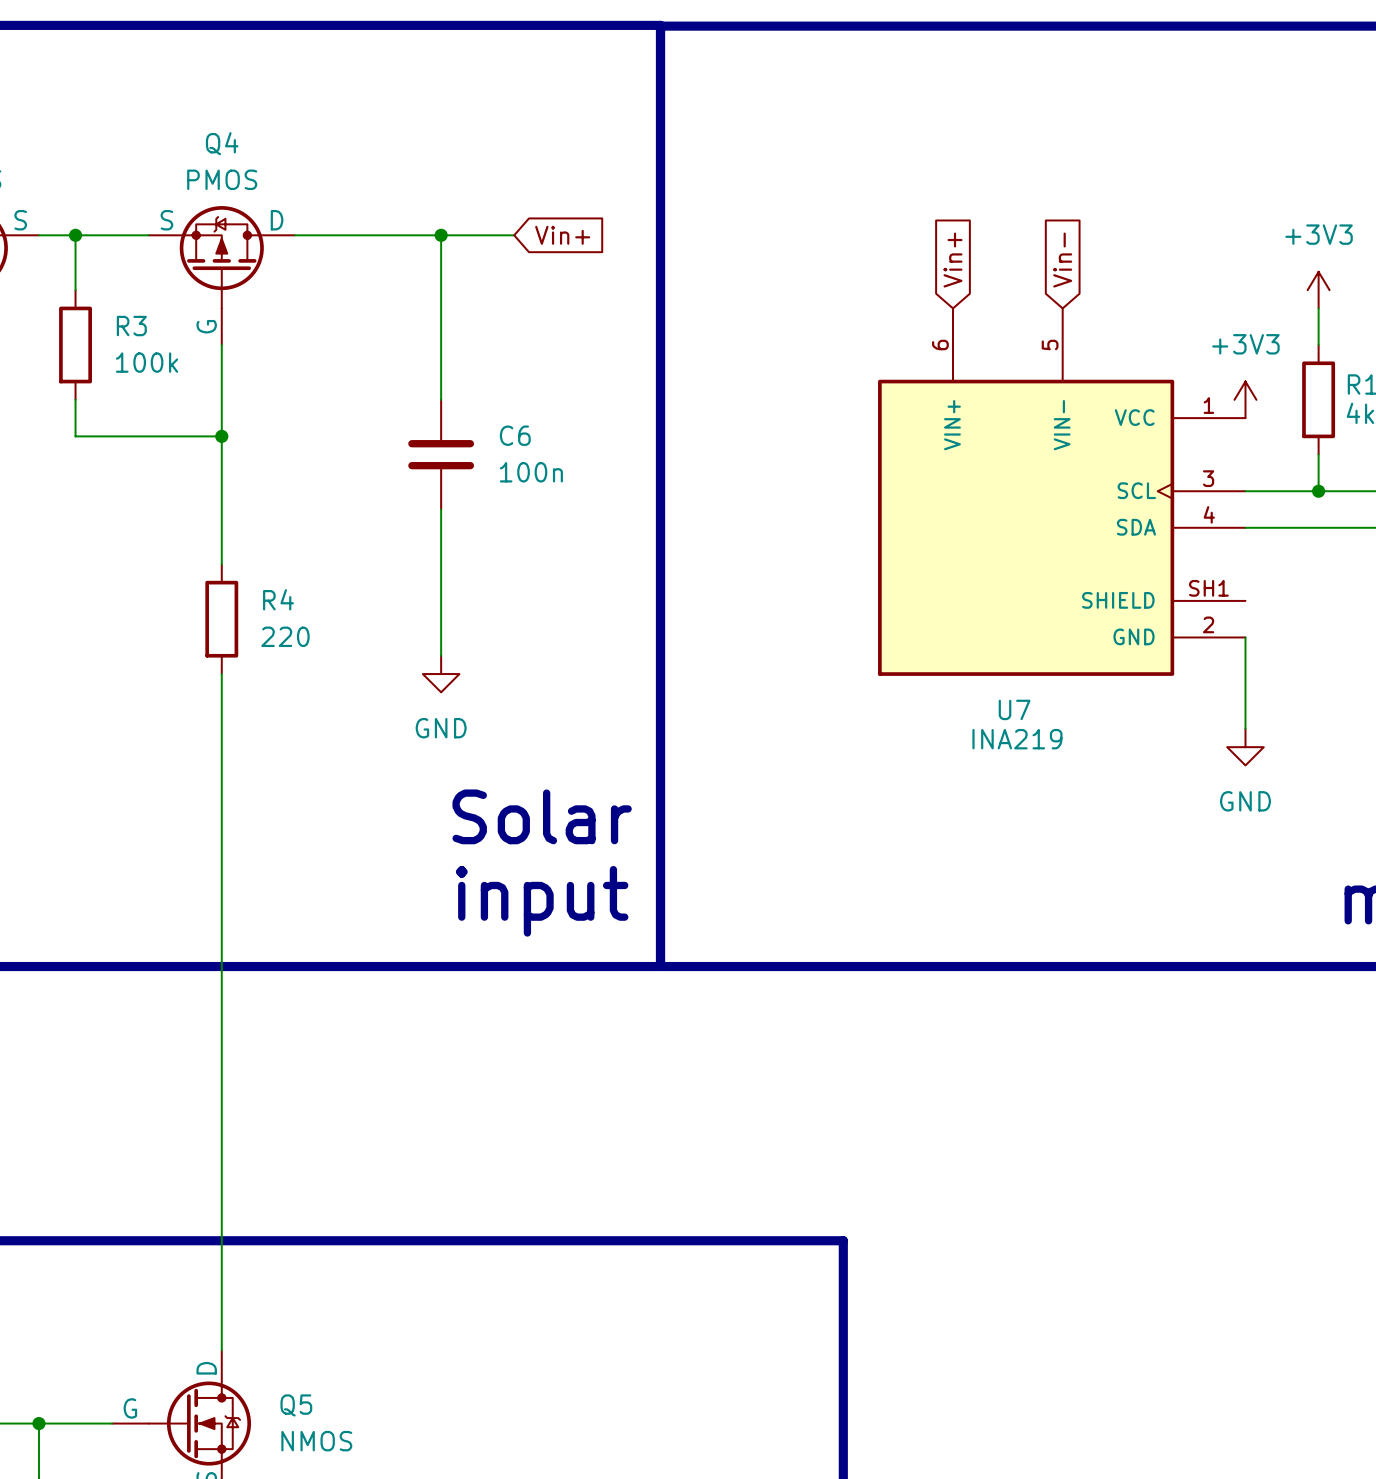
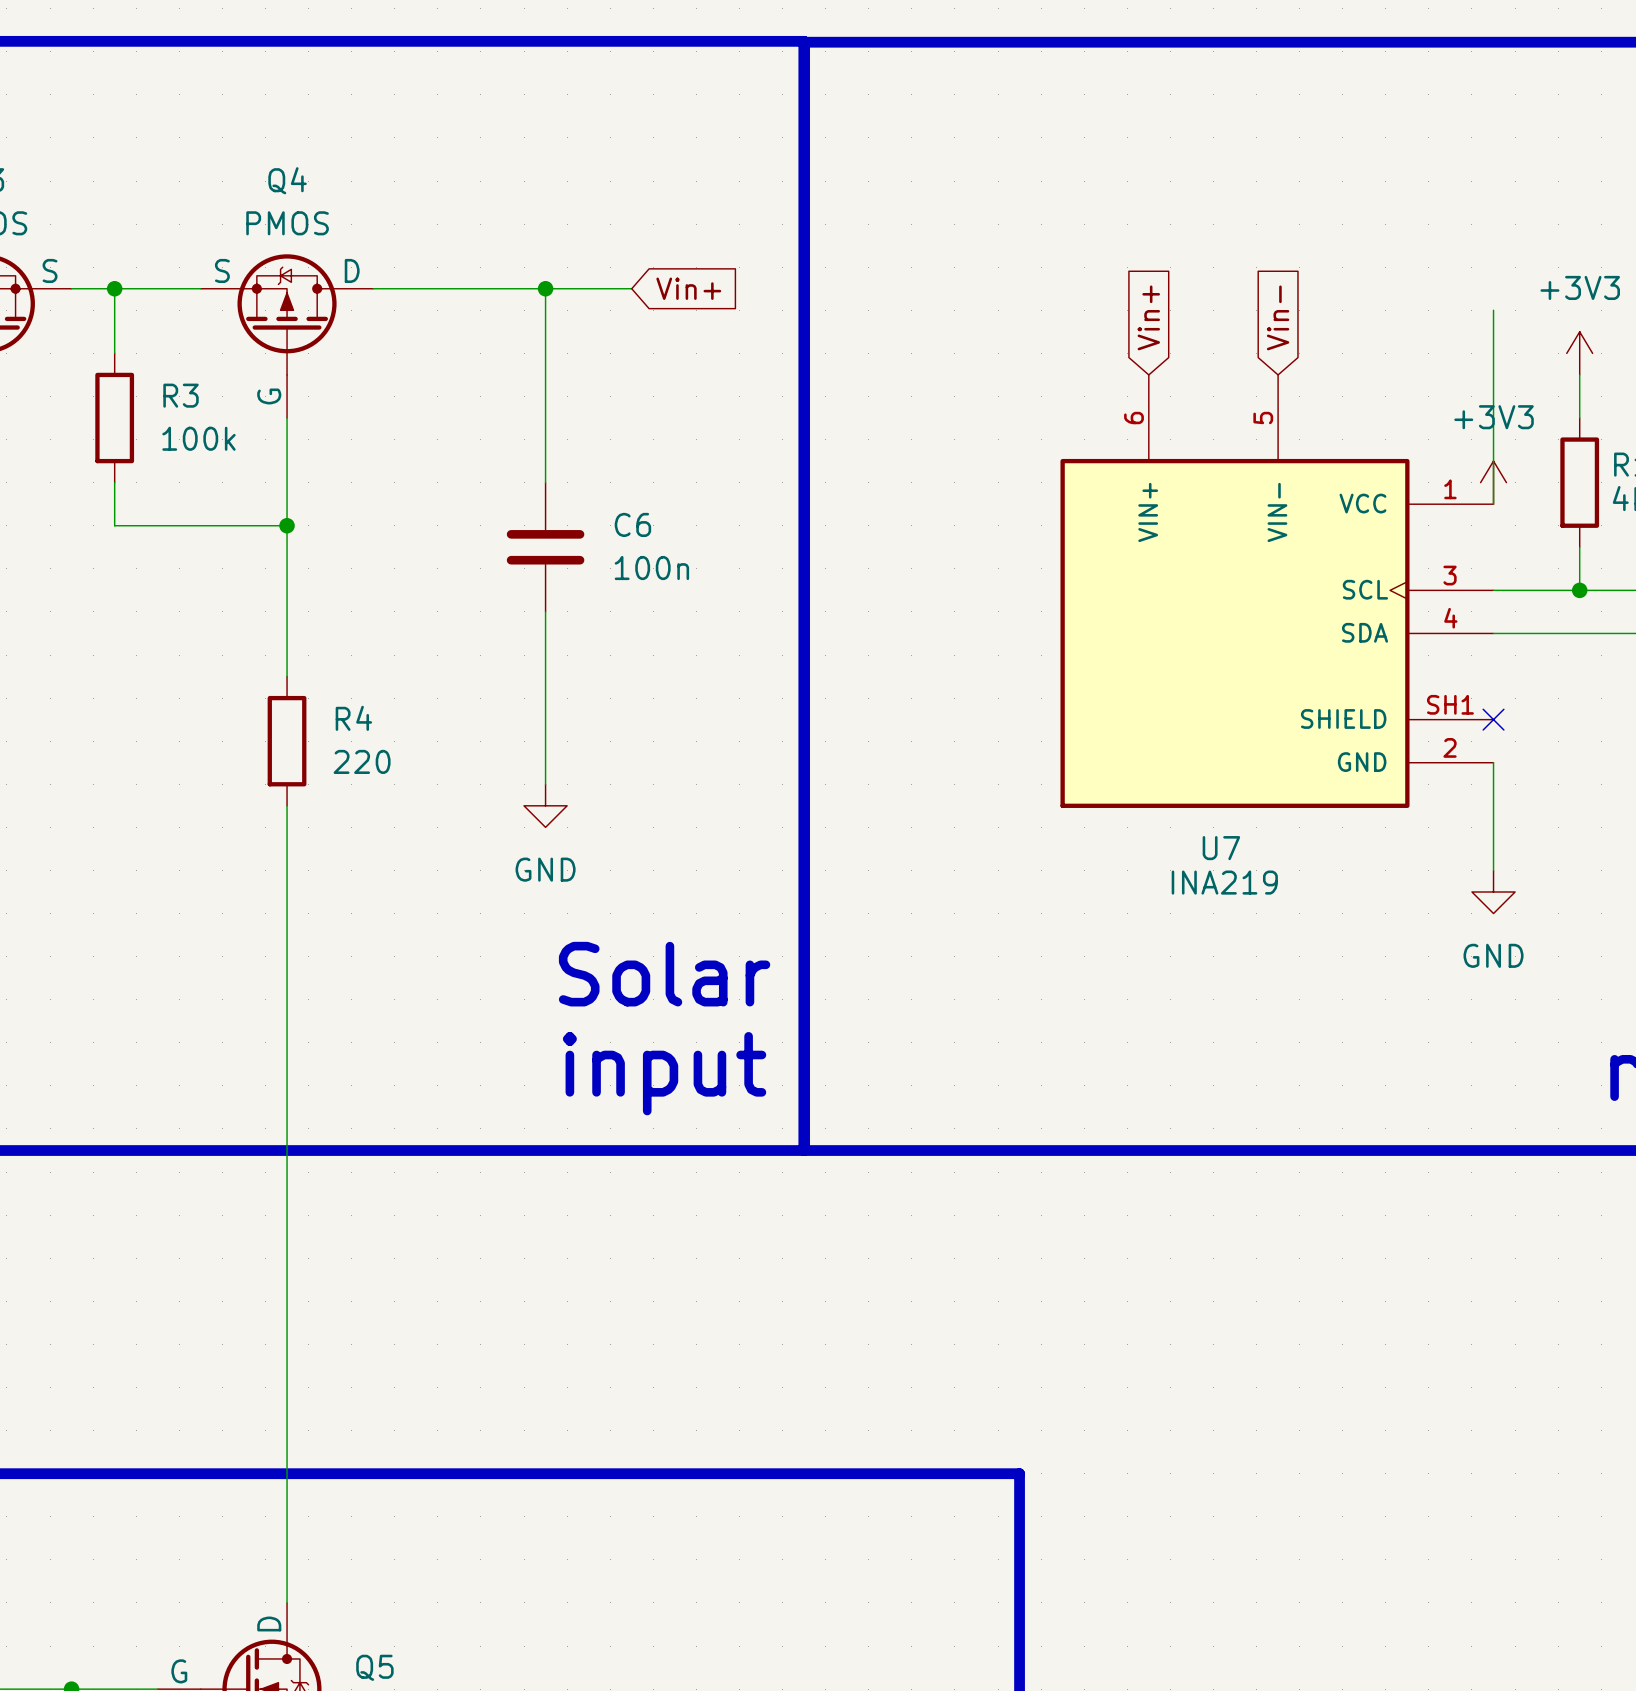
wire: none -> (1493, 310) (1493, 504)
no-connect mark: none -> (1493, 719)

